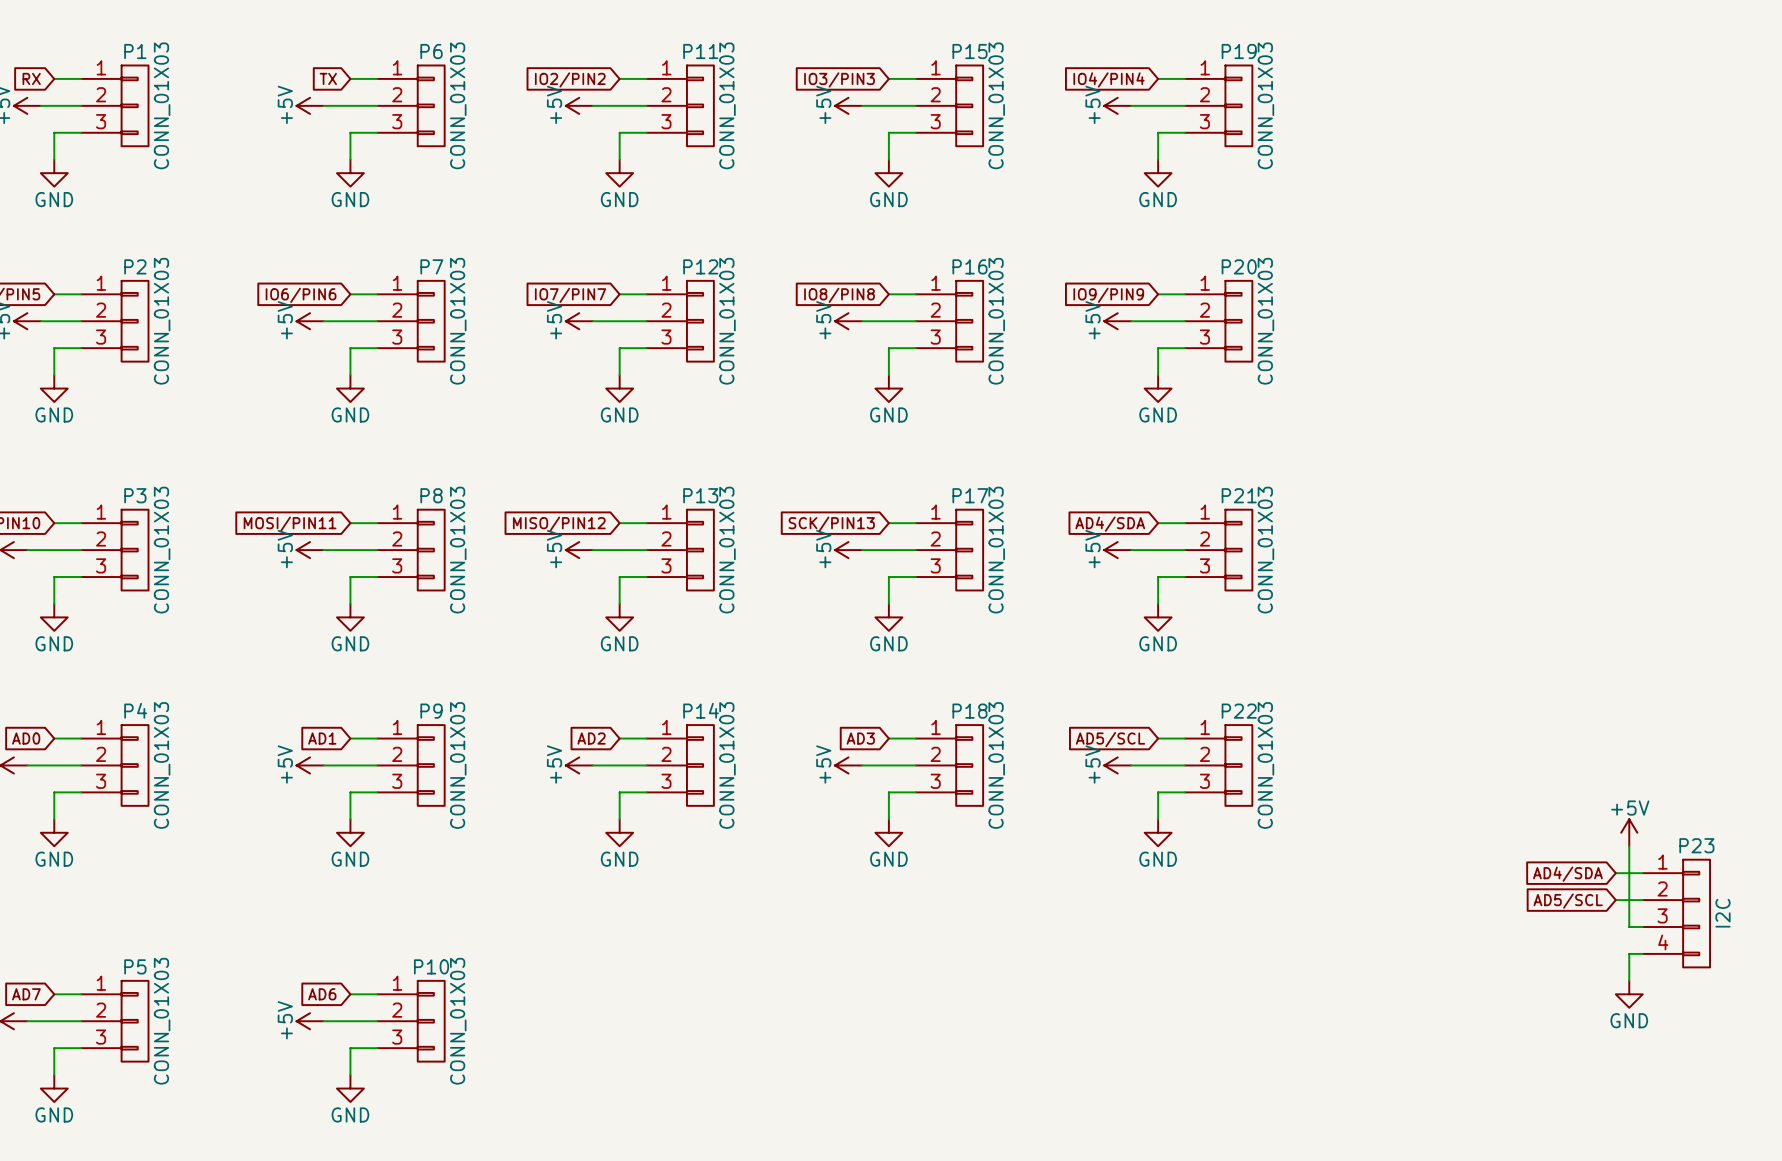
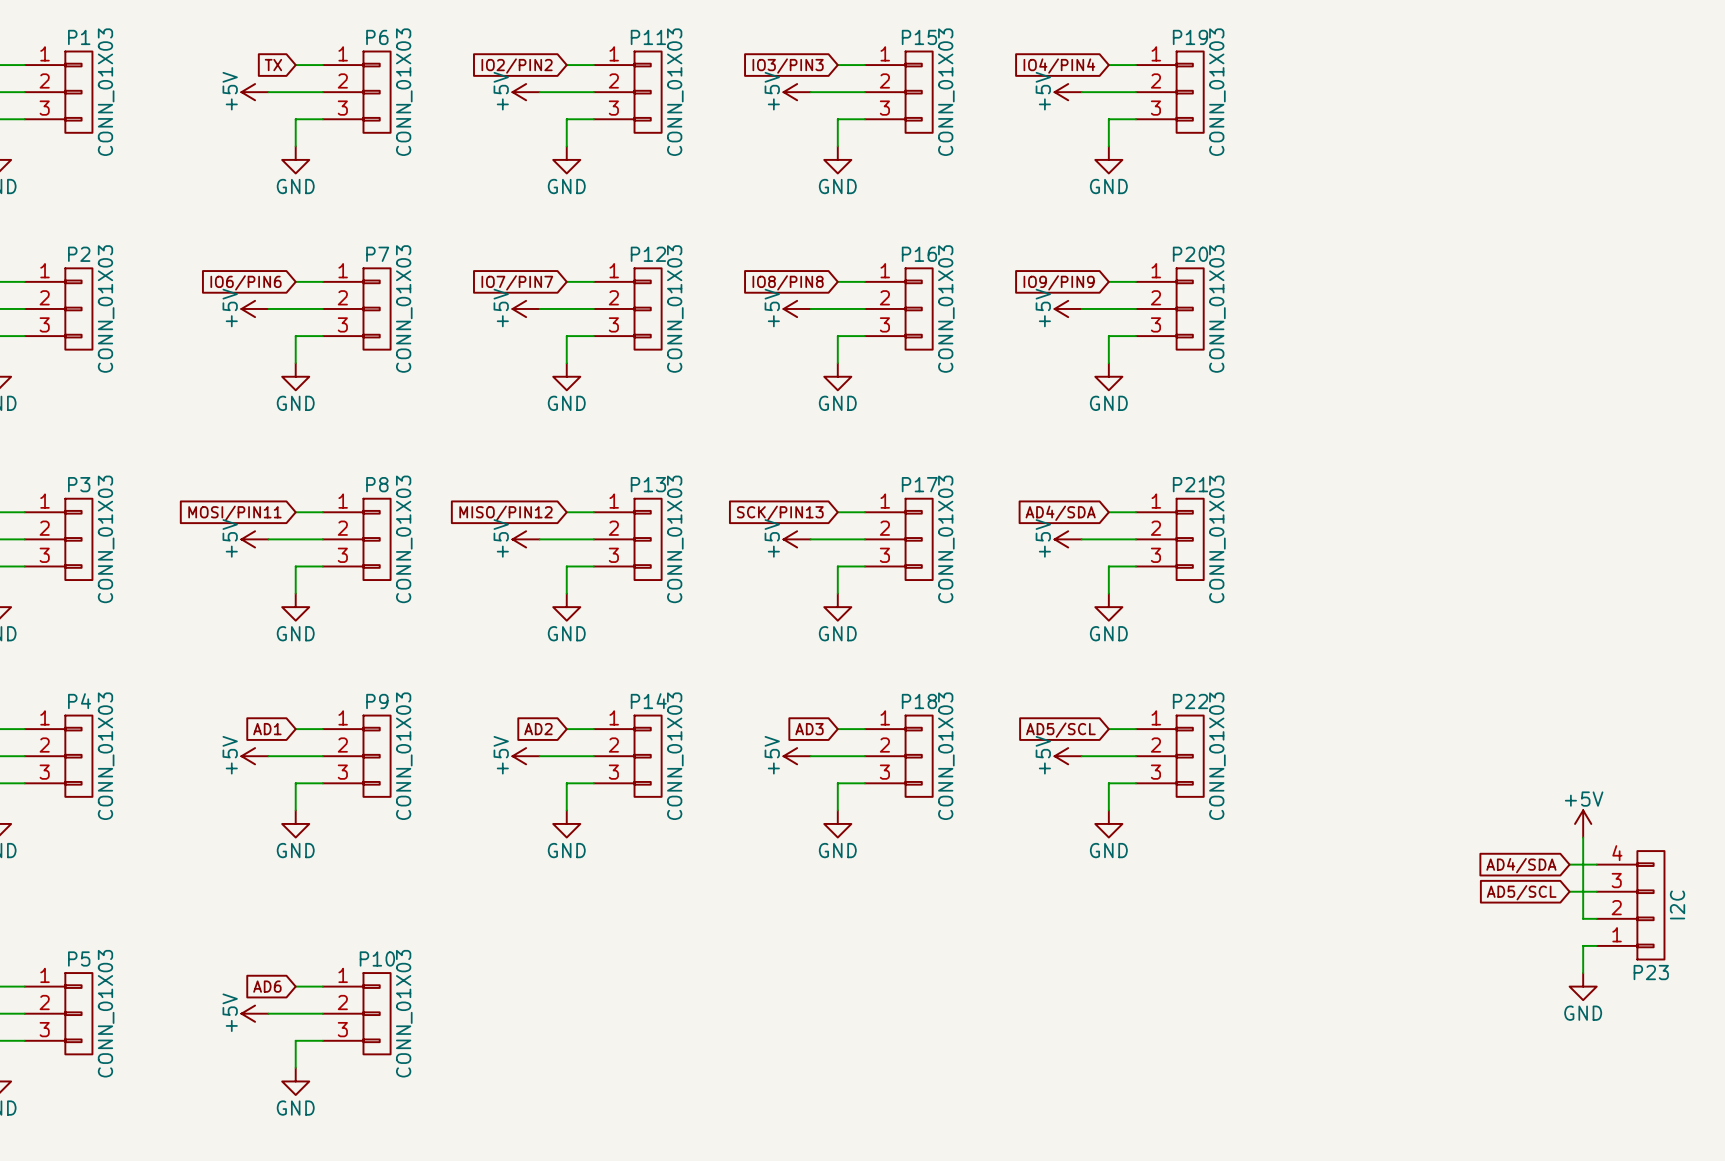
P23 flip: as is (1696, 913) -> up-down (1650, 905)

